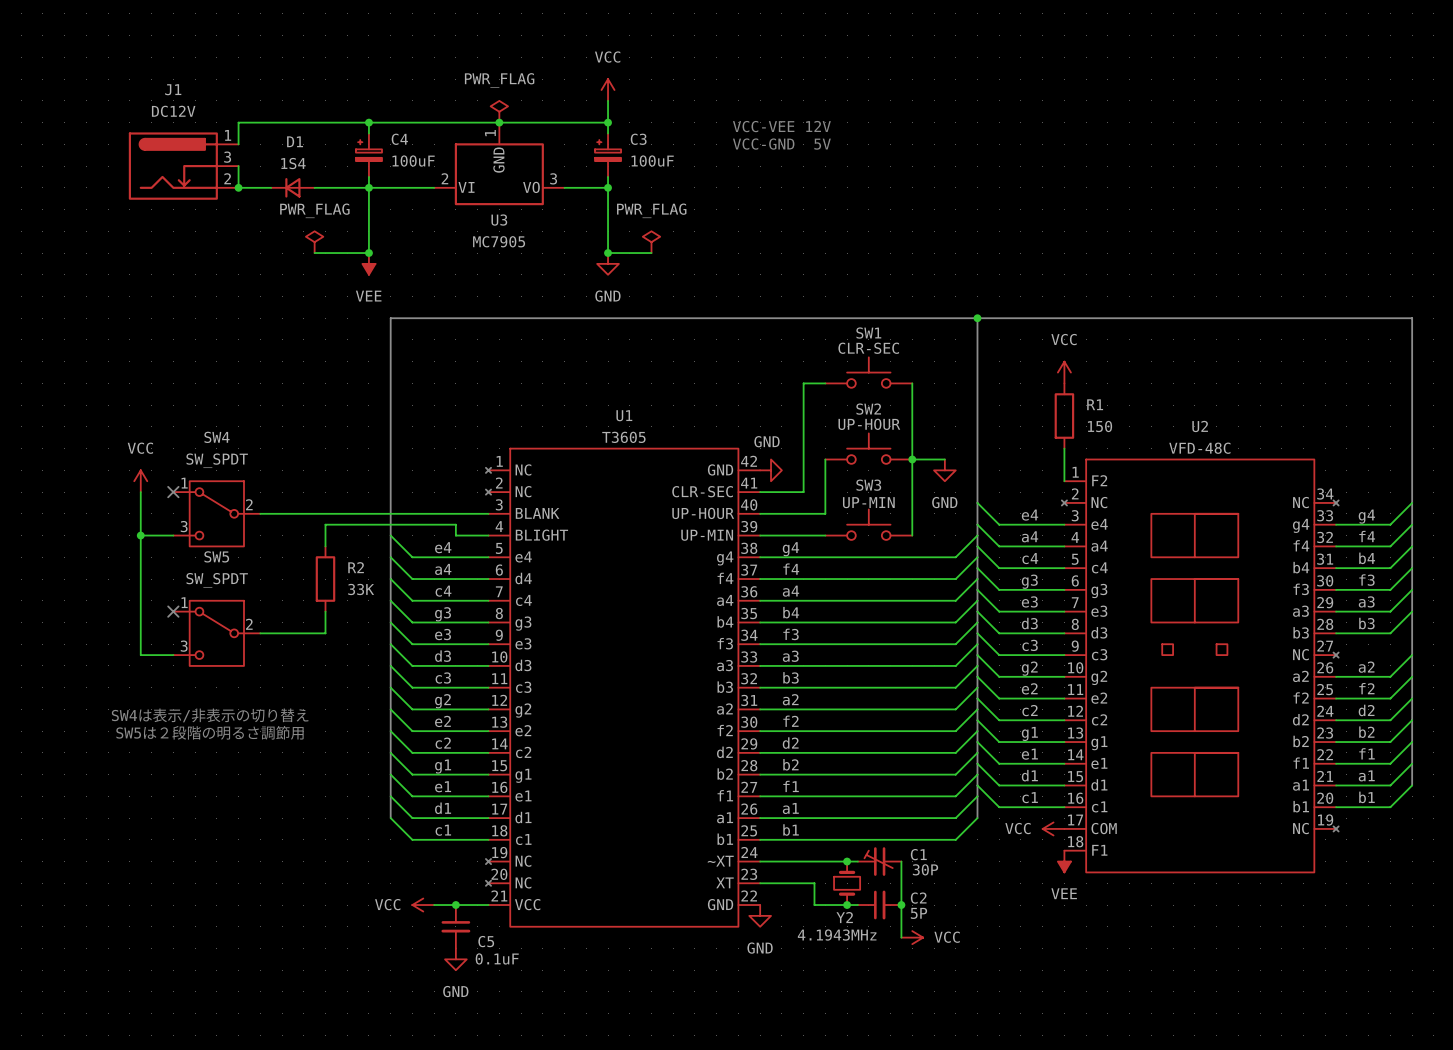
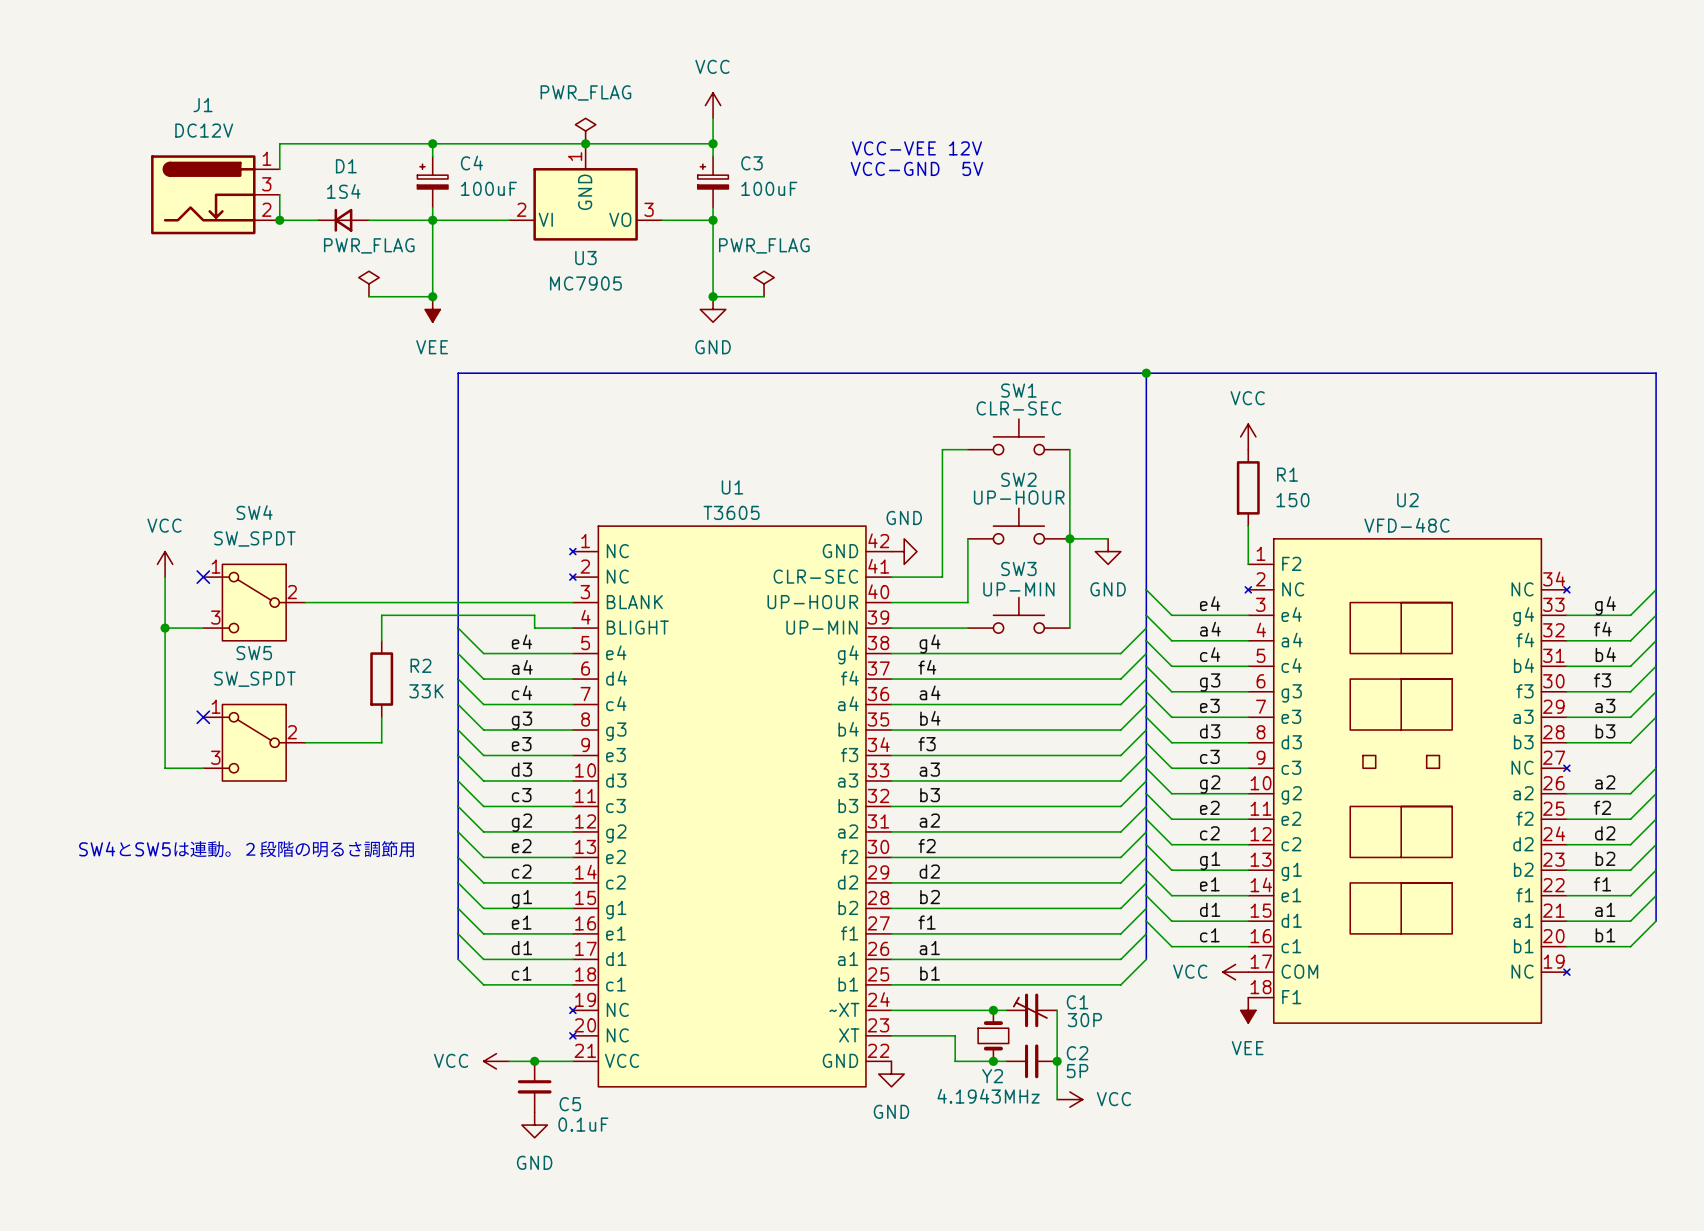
text: SW4は表示/非表示の切り替え (210, 715) -> none
text: SW5は２段階の明るさ調節用 (209, 732) -> SW4とSW5は連動。２段階の明るさ調節用 (246, 849)

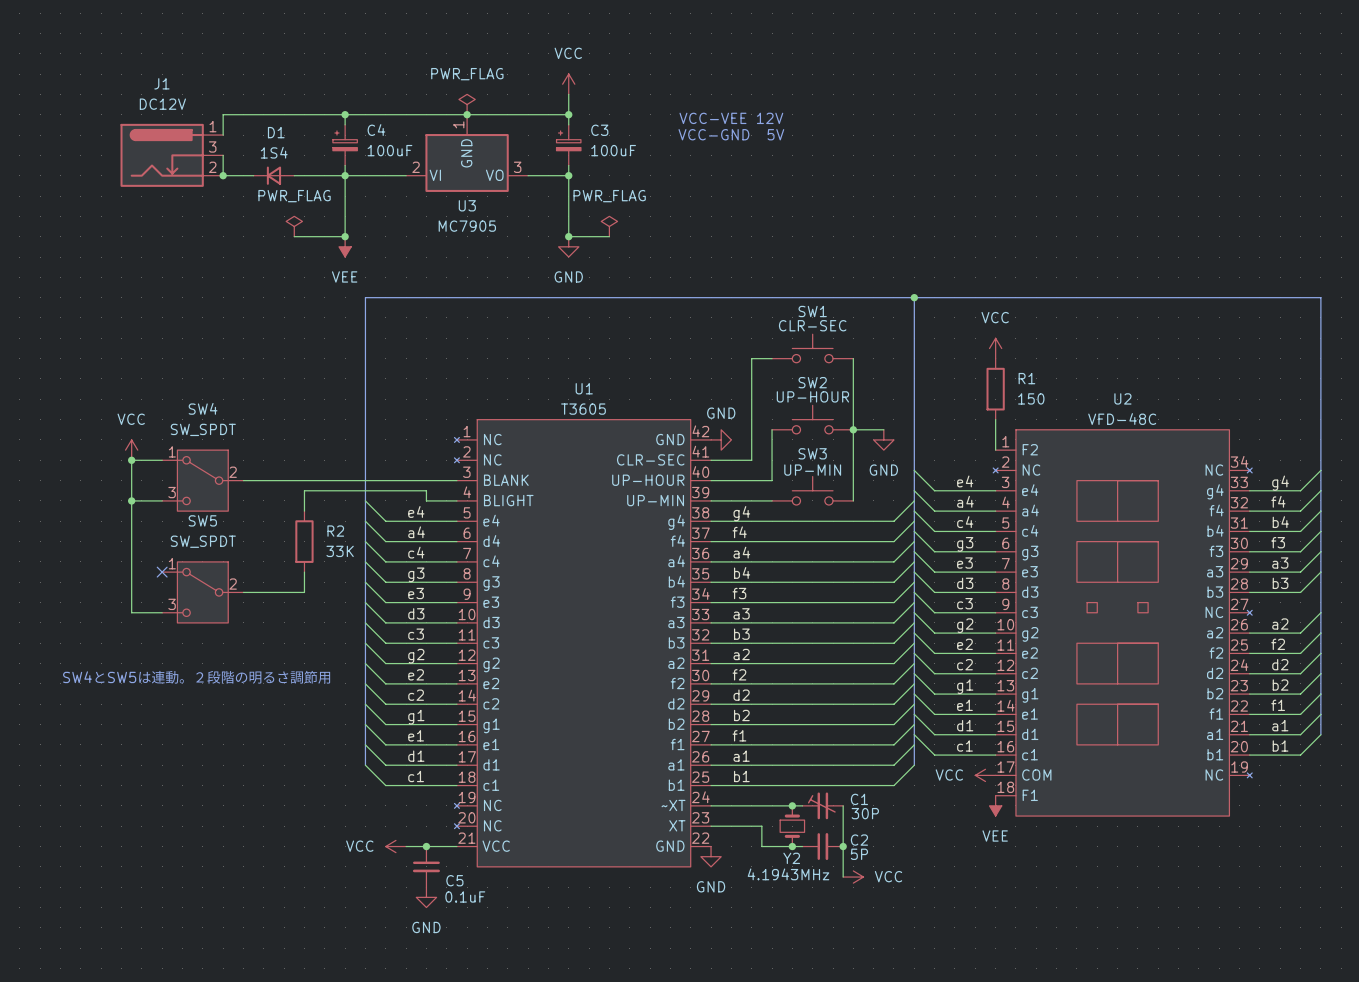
wire: none -> (131, 460) (162, 460)
junction: none -> (131, 460)
no-connect mark: (203, 577) -> none

